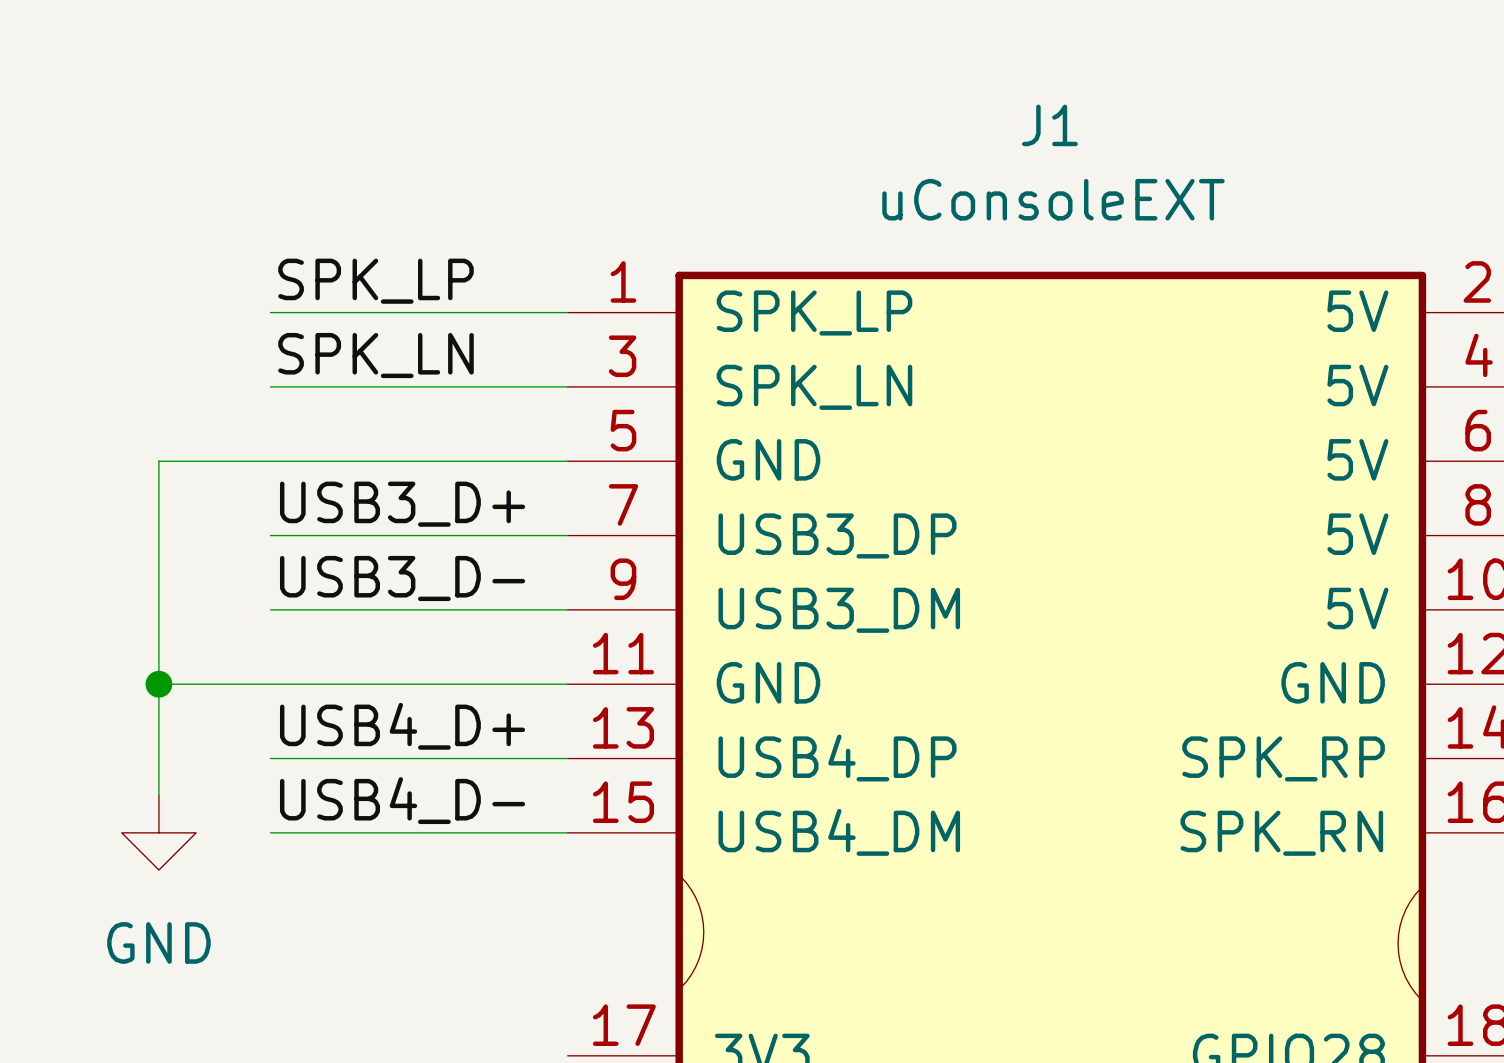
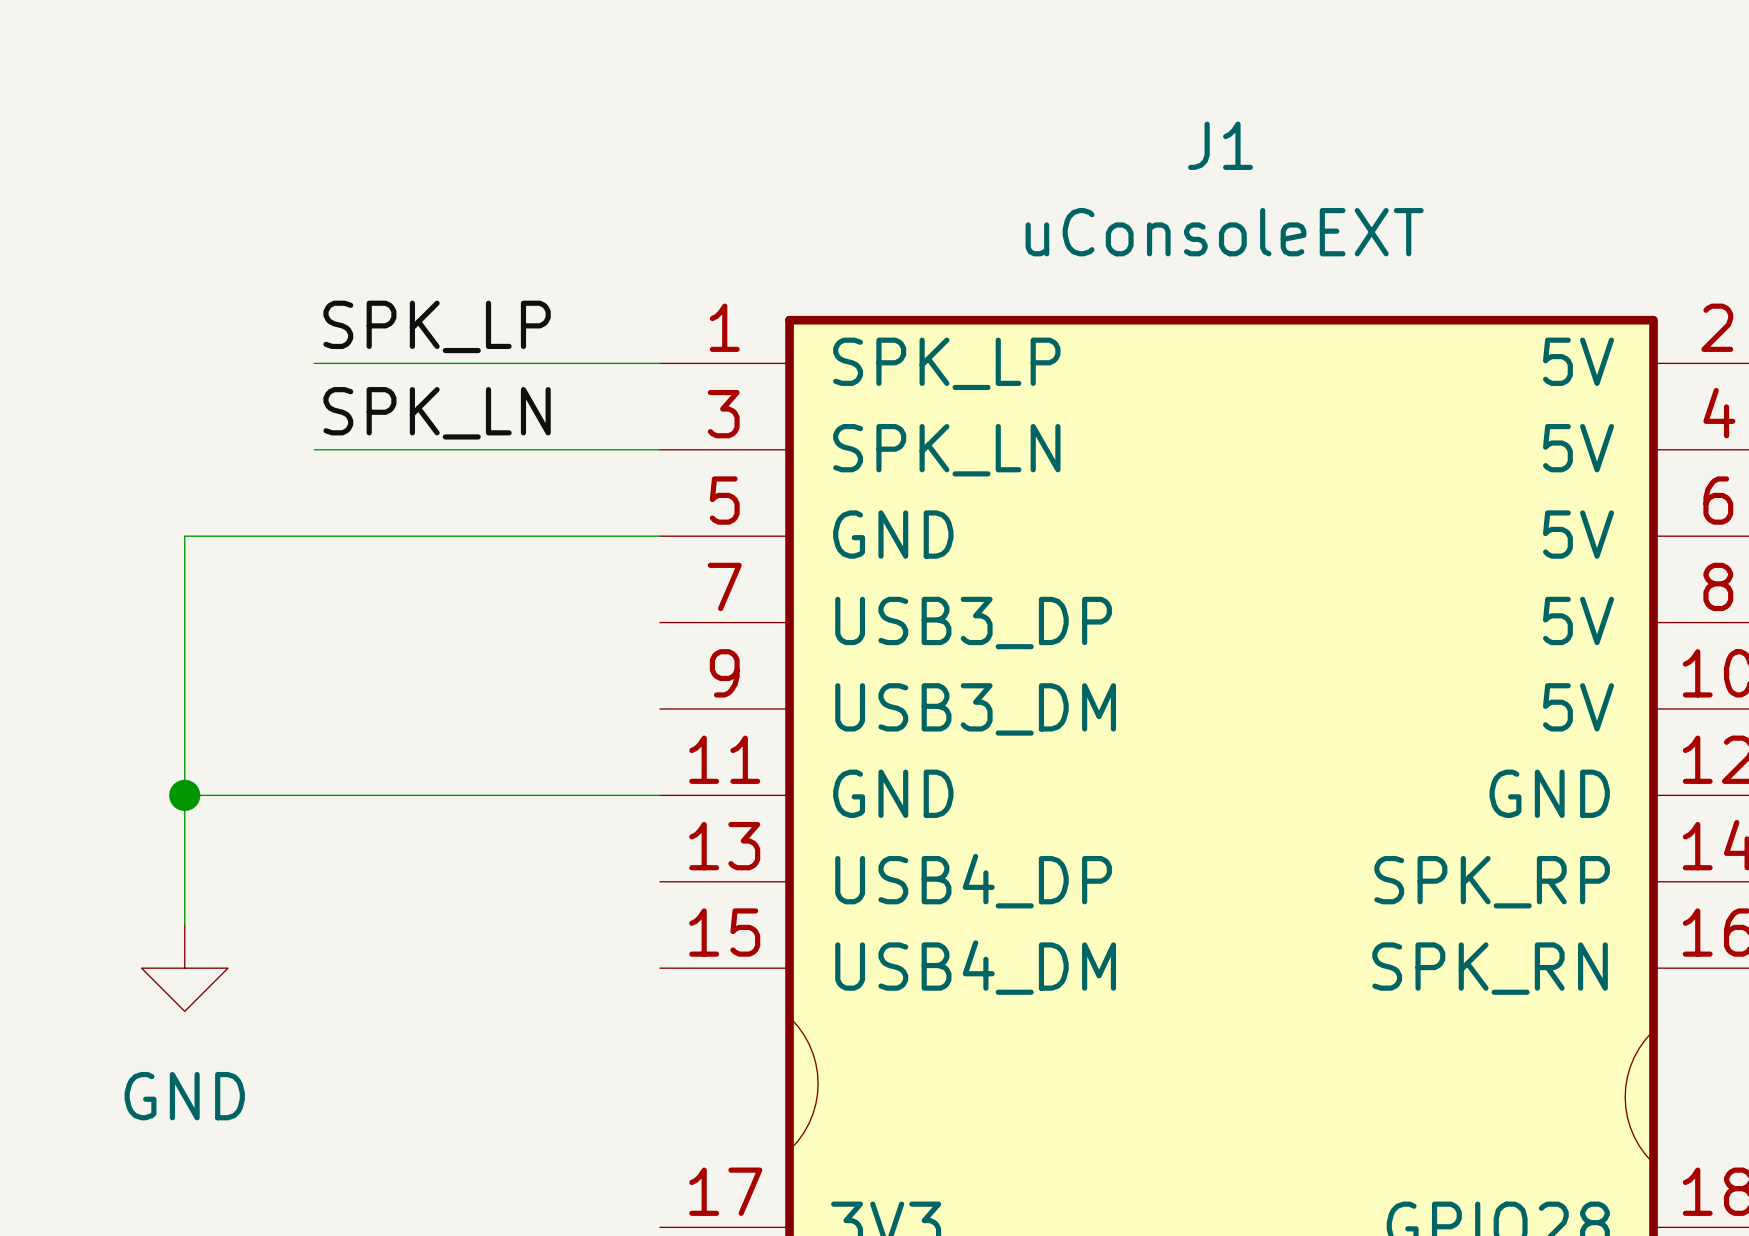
label: USB3_D+ (402, 504) -> none
wire: (270, 535) (567, 535) -> none
label: USB3_D- (402, 578) -> none
wire: (270, 609) (567, 609) -> none
label: USB4_D+ (402, 726) -> none
wire: (270, 758) (567, 758) -> none
label: USB4_D- (402, 800) -> none
wire: (270, 832) (567, 832) -> none

